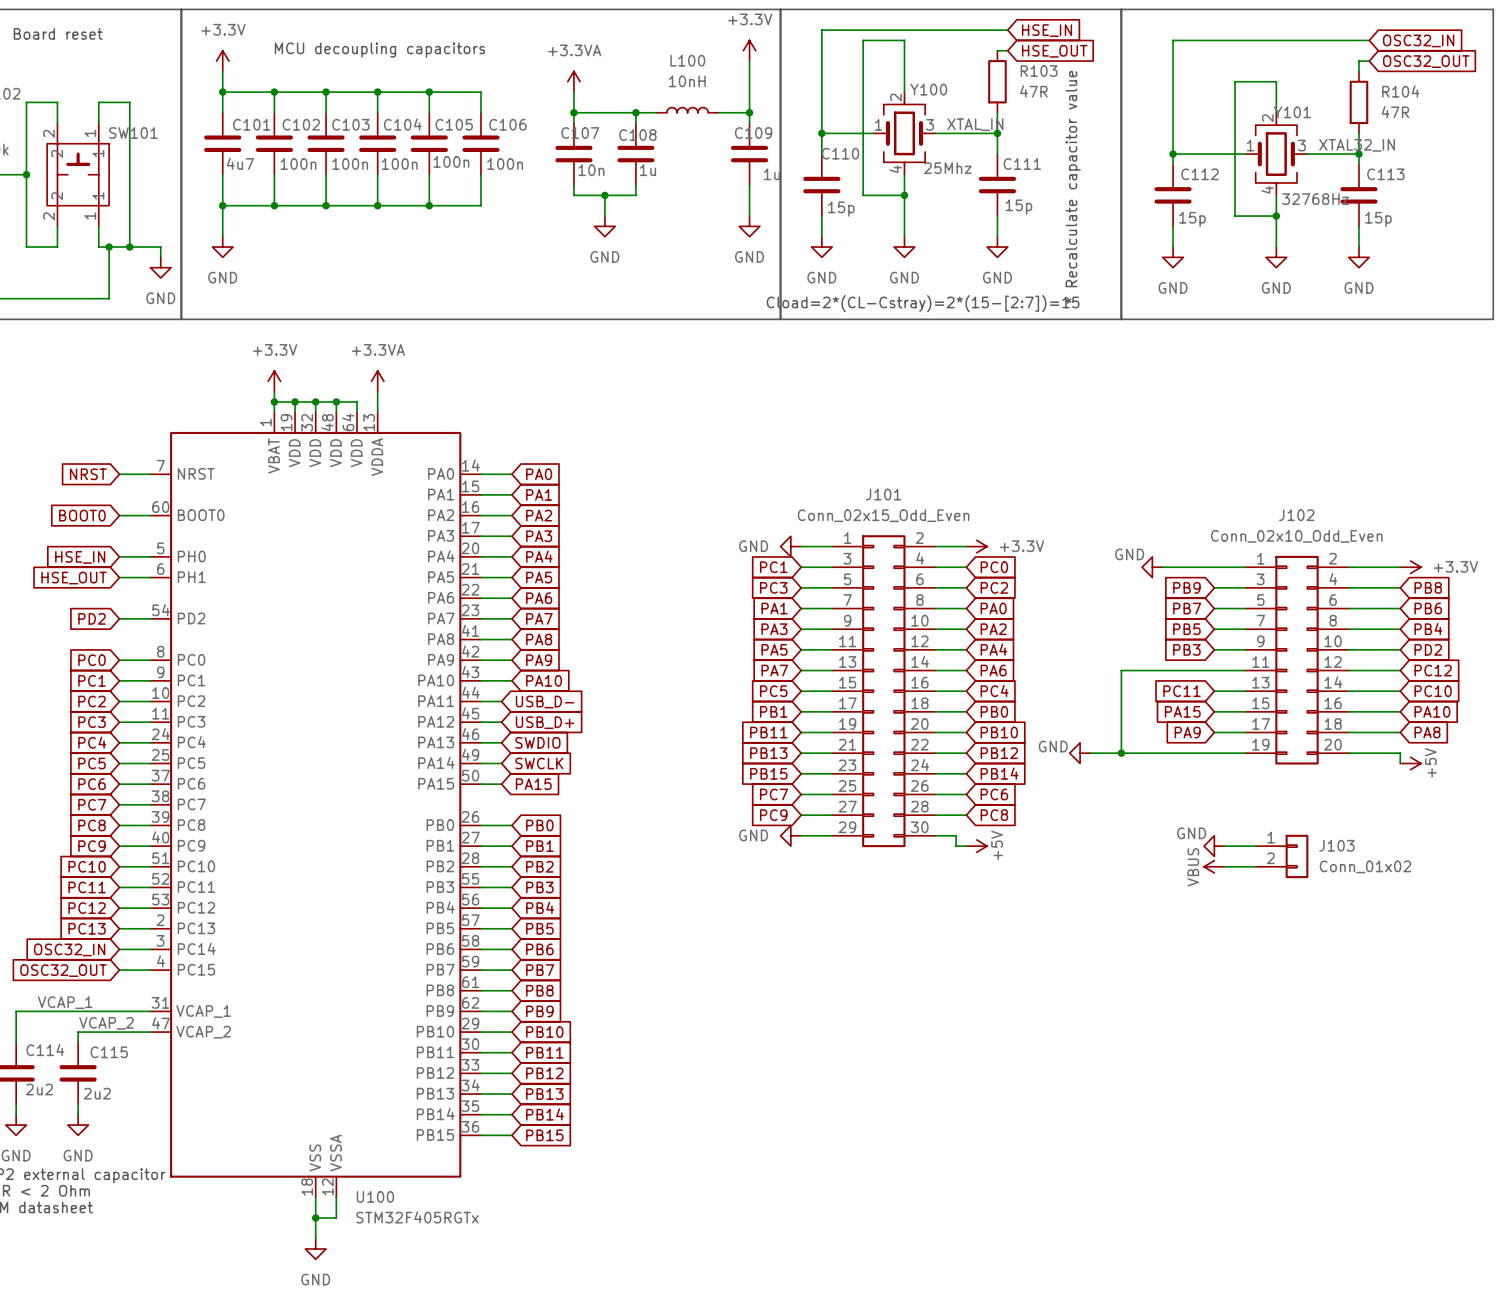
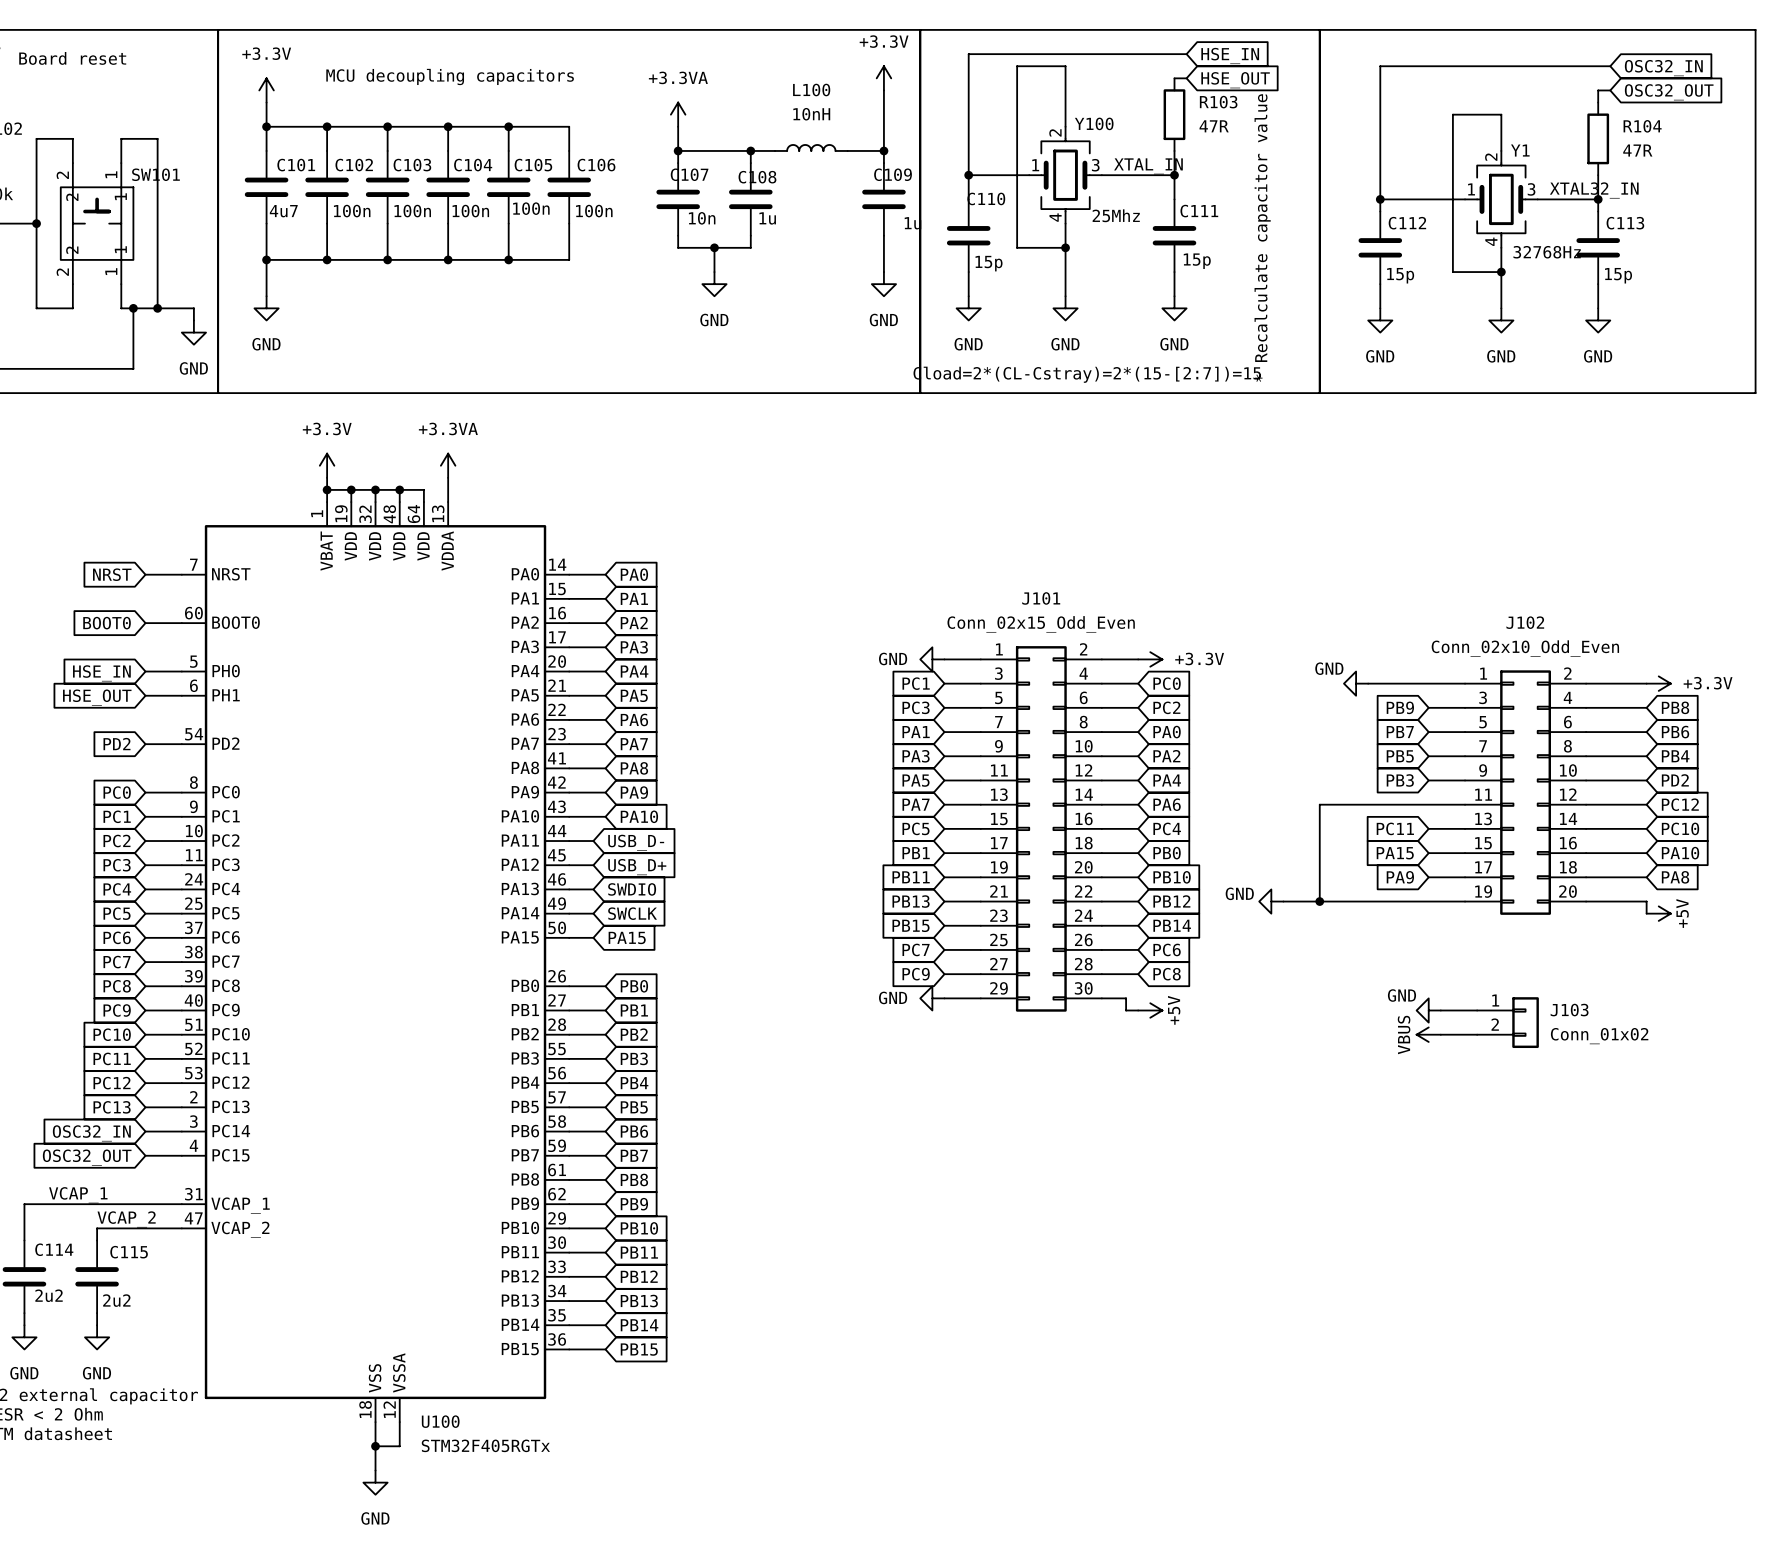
Y101 name: Y101 (1292, 112) -> Y1 (1520, 150)

